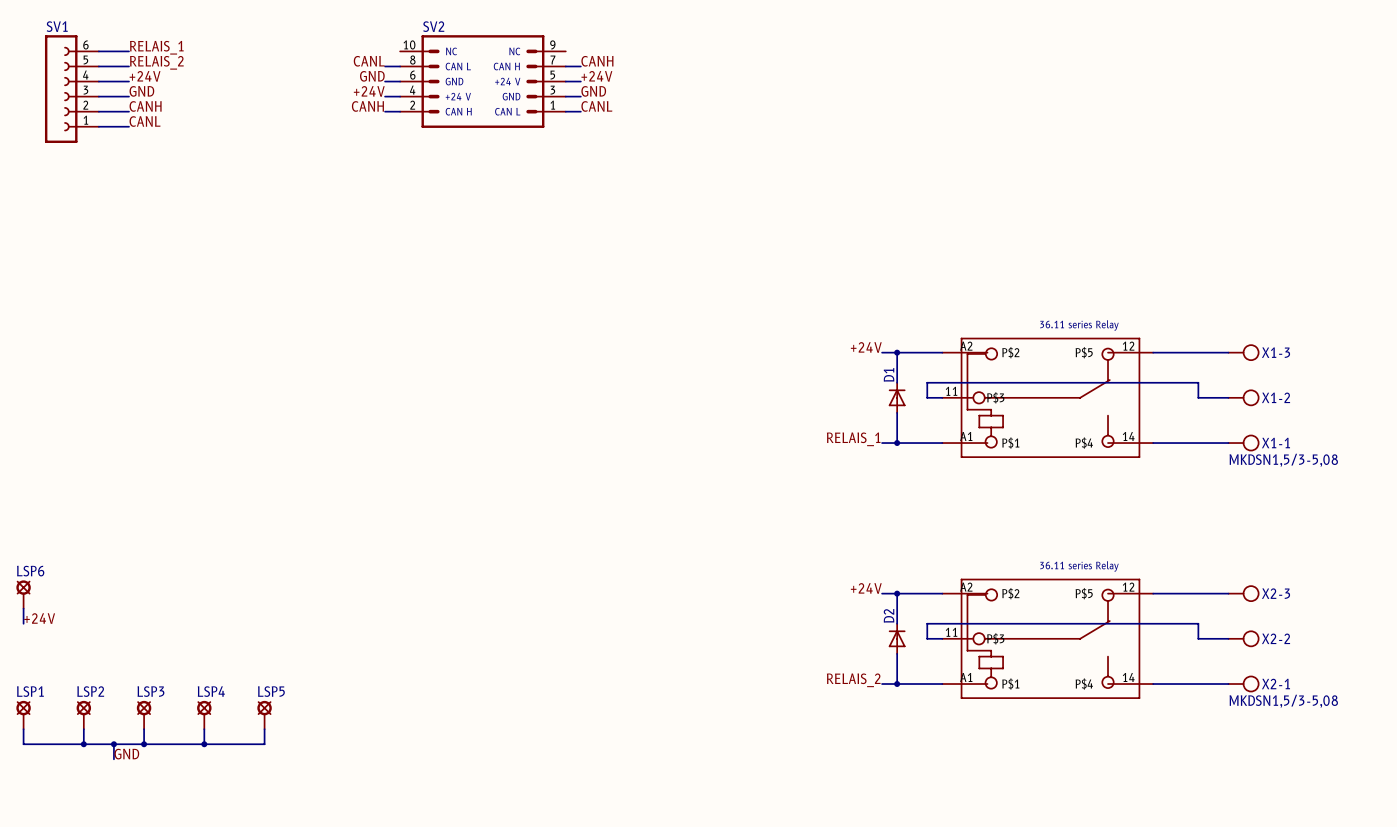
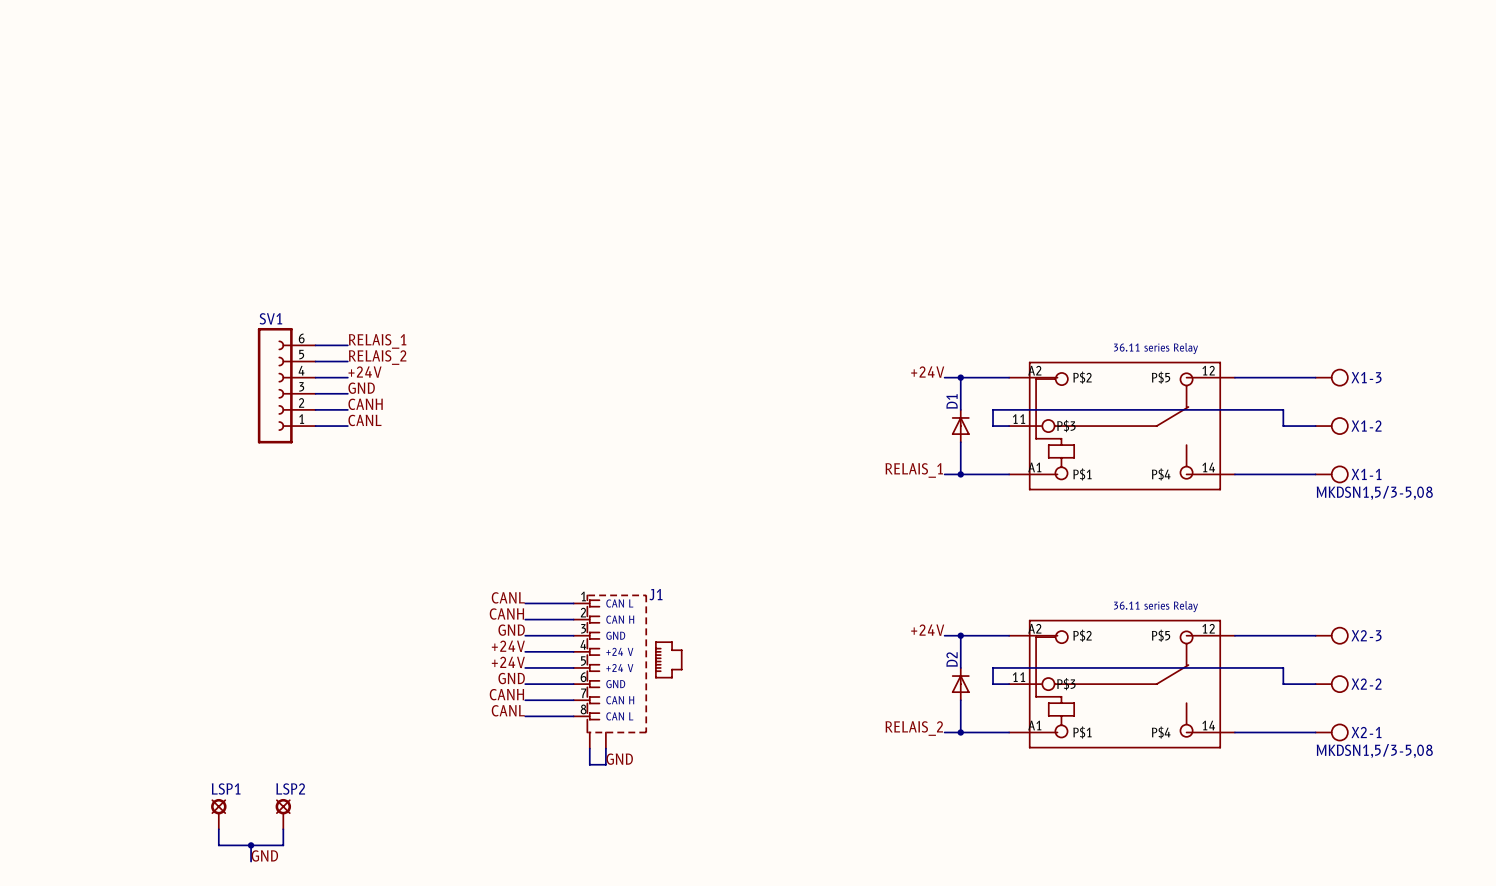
label: RELAIS_1 (156, 47) -> none
wire: (98, 51) (129, 51) -> none
label: CANL (369, 61) -> none
label: CANH (597, 61) -> none
label: RELAIS_2 (156, 62) -> none
wire: (98, 66) (129, 66) -> none
wire: (385, 66) (400, 66) -> none
wire: (565, 66) (580, 66) -> none
label: +24V (145, 76) -> none
label: GND (372, 76) -> none
label: +24V (596, 76) -> none
wire: (98, 81) (129, 81) -> none
wire: (385, 81) (400, 81) -> none
SV2: (482, 81) -> none
wire: (565, 81) (580, 81) -> none
SV1 position: (71, 89) -> (286, 385)
label: GND (141, 91) -> none
label: +24V (369, 91) -> none
label: GND (593, 91) -> none
wire: (98, 96) (129, 96) -> none
wire: (385, 96) (400, 96) -> none
wire: (565, 96) (580, 96) -> none
label: CANH (145, 106) -> none
label: CANH (367, 106) -> none
label: CANL (596, 106) -> none
wire: (98, 111) (129, 111) -> none
wire: (385, 111) (400, 111) -> none
wire: (565, 111) (580, 111) -> none
label: CANL (145, 121) -> none
wire: (98, 126) (129, 126) -> none
label: none -> RELAIS_1 (377, 341)
wire: none -> (315, 345) (347, 345)
label: none -> RELAIS_2 (377, 357)
wire: none -> (315, 361) (347, 361)
label: none -> +24V (365, 372)
wire: none -> (315, 377) (347, 377)
label: none -> GND (361, 388)
wire: none -> (315, 393) (347, 393)
label: none -> CANH (365, 404)
wire: none -> (315, 409) (347, 409)
label: none -> CANL (364, 420)
wire: none -> (315, 426) (347, 426)
label: none -> CANL (508, 597)
wire: none -> (525, 603) (573, 603)
label: none -> CANH (506, 614)
wire: none -> (525, 619) (573, 619)
label: none -> GND (511, 630)
wire: none -> (525, 635) (573, 635)
LSP6: (23, 594) -> none
label: none -> +24V (508, 646)
wire: (23, 608) (23, 623) -> none
wire: none -> (525, 651) (573, 651)
label: +24V (39, 618) -> none
label: none -> +24V (508, 662)
wire: none -> (525, 667) (573, 667)
J1: none -> (628, 671)
label: none -> GND (511, 678)
wire: none -> (525, 684) (573, 684)
label: none -> CANH (506, 694)
wire: none -> (525, 700) (573, 700)
label: none -> CANL (508, 710)
wire: none -> (525, 716) (573, 716)
wire: none -> (589, 748) (589, 764) (605, 764) (605, 748)
label: none -> GND (619, 759)
LSP1 position: (23, 715) -> (218, 814)
LSP2 position: (83, 715) -> (283, 814)
LSP3: (144, 715) -> none
LSP4: (204, 715) -> none
LSP5: (264, 715) -> none
wire: (23, 729) (23, 744) (264, 744) (264, 729) -> none
wire: (83, 729) (83, 744) -> none
wire: (144, 729) (144, 744) -> none
wire: (204, 729) (204, 744) -> (251, 845) (251, 861)
junction: (83, 744) -> none
wire: (113, 744) (113, 759) -> none
junction: (113, 744) -> none
junction: (144, 744) -> none
junction: (204, 744) -> none
label position: GND (126, 754) -> GND (264, 855)
wire: none -> (218, 829) (218, 845) (283, 845) (283, 829)
junction: none -> (251, 845)

